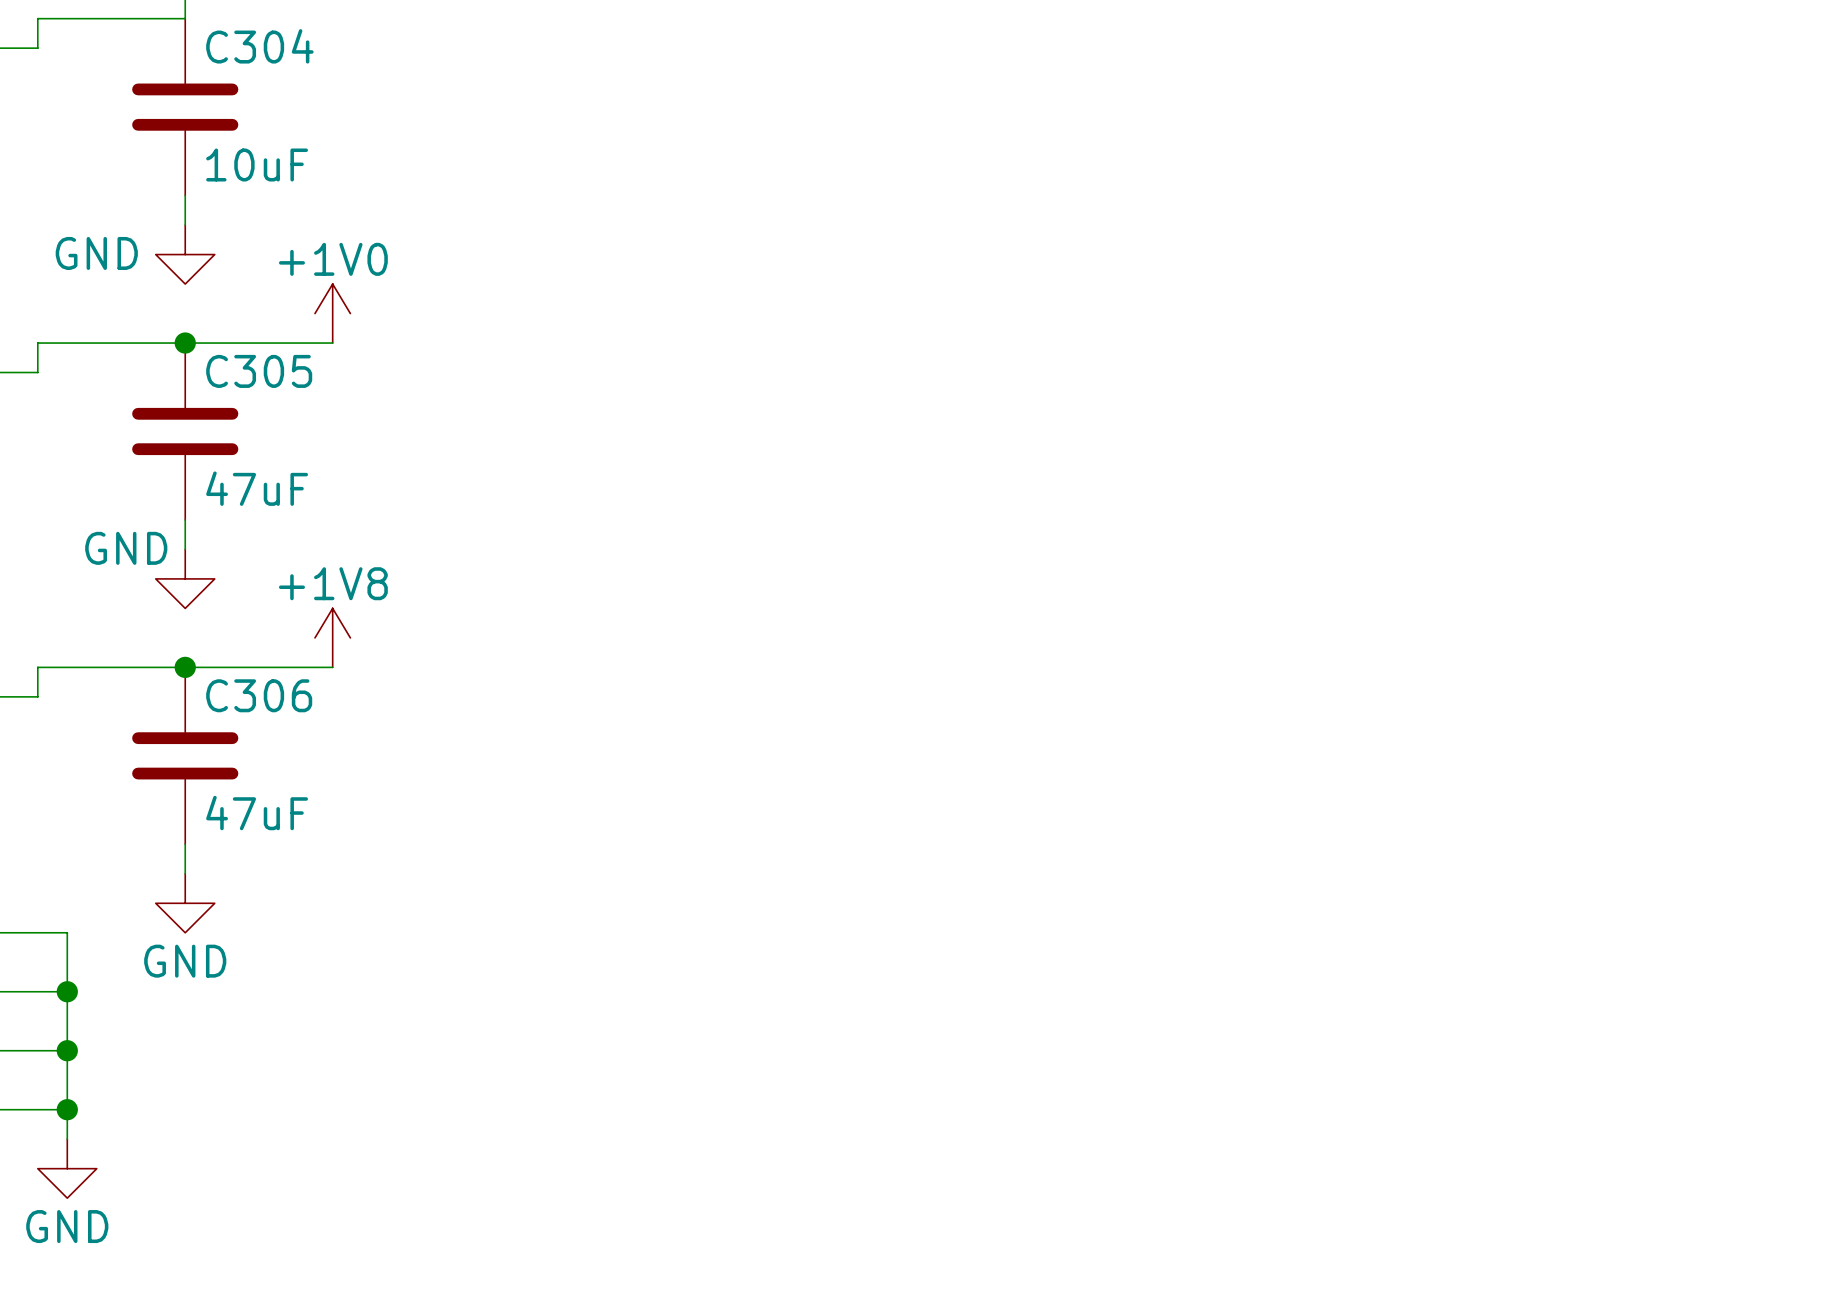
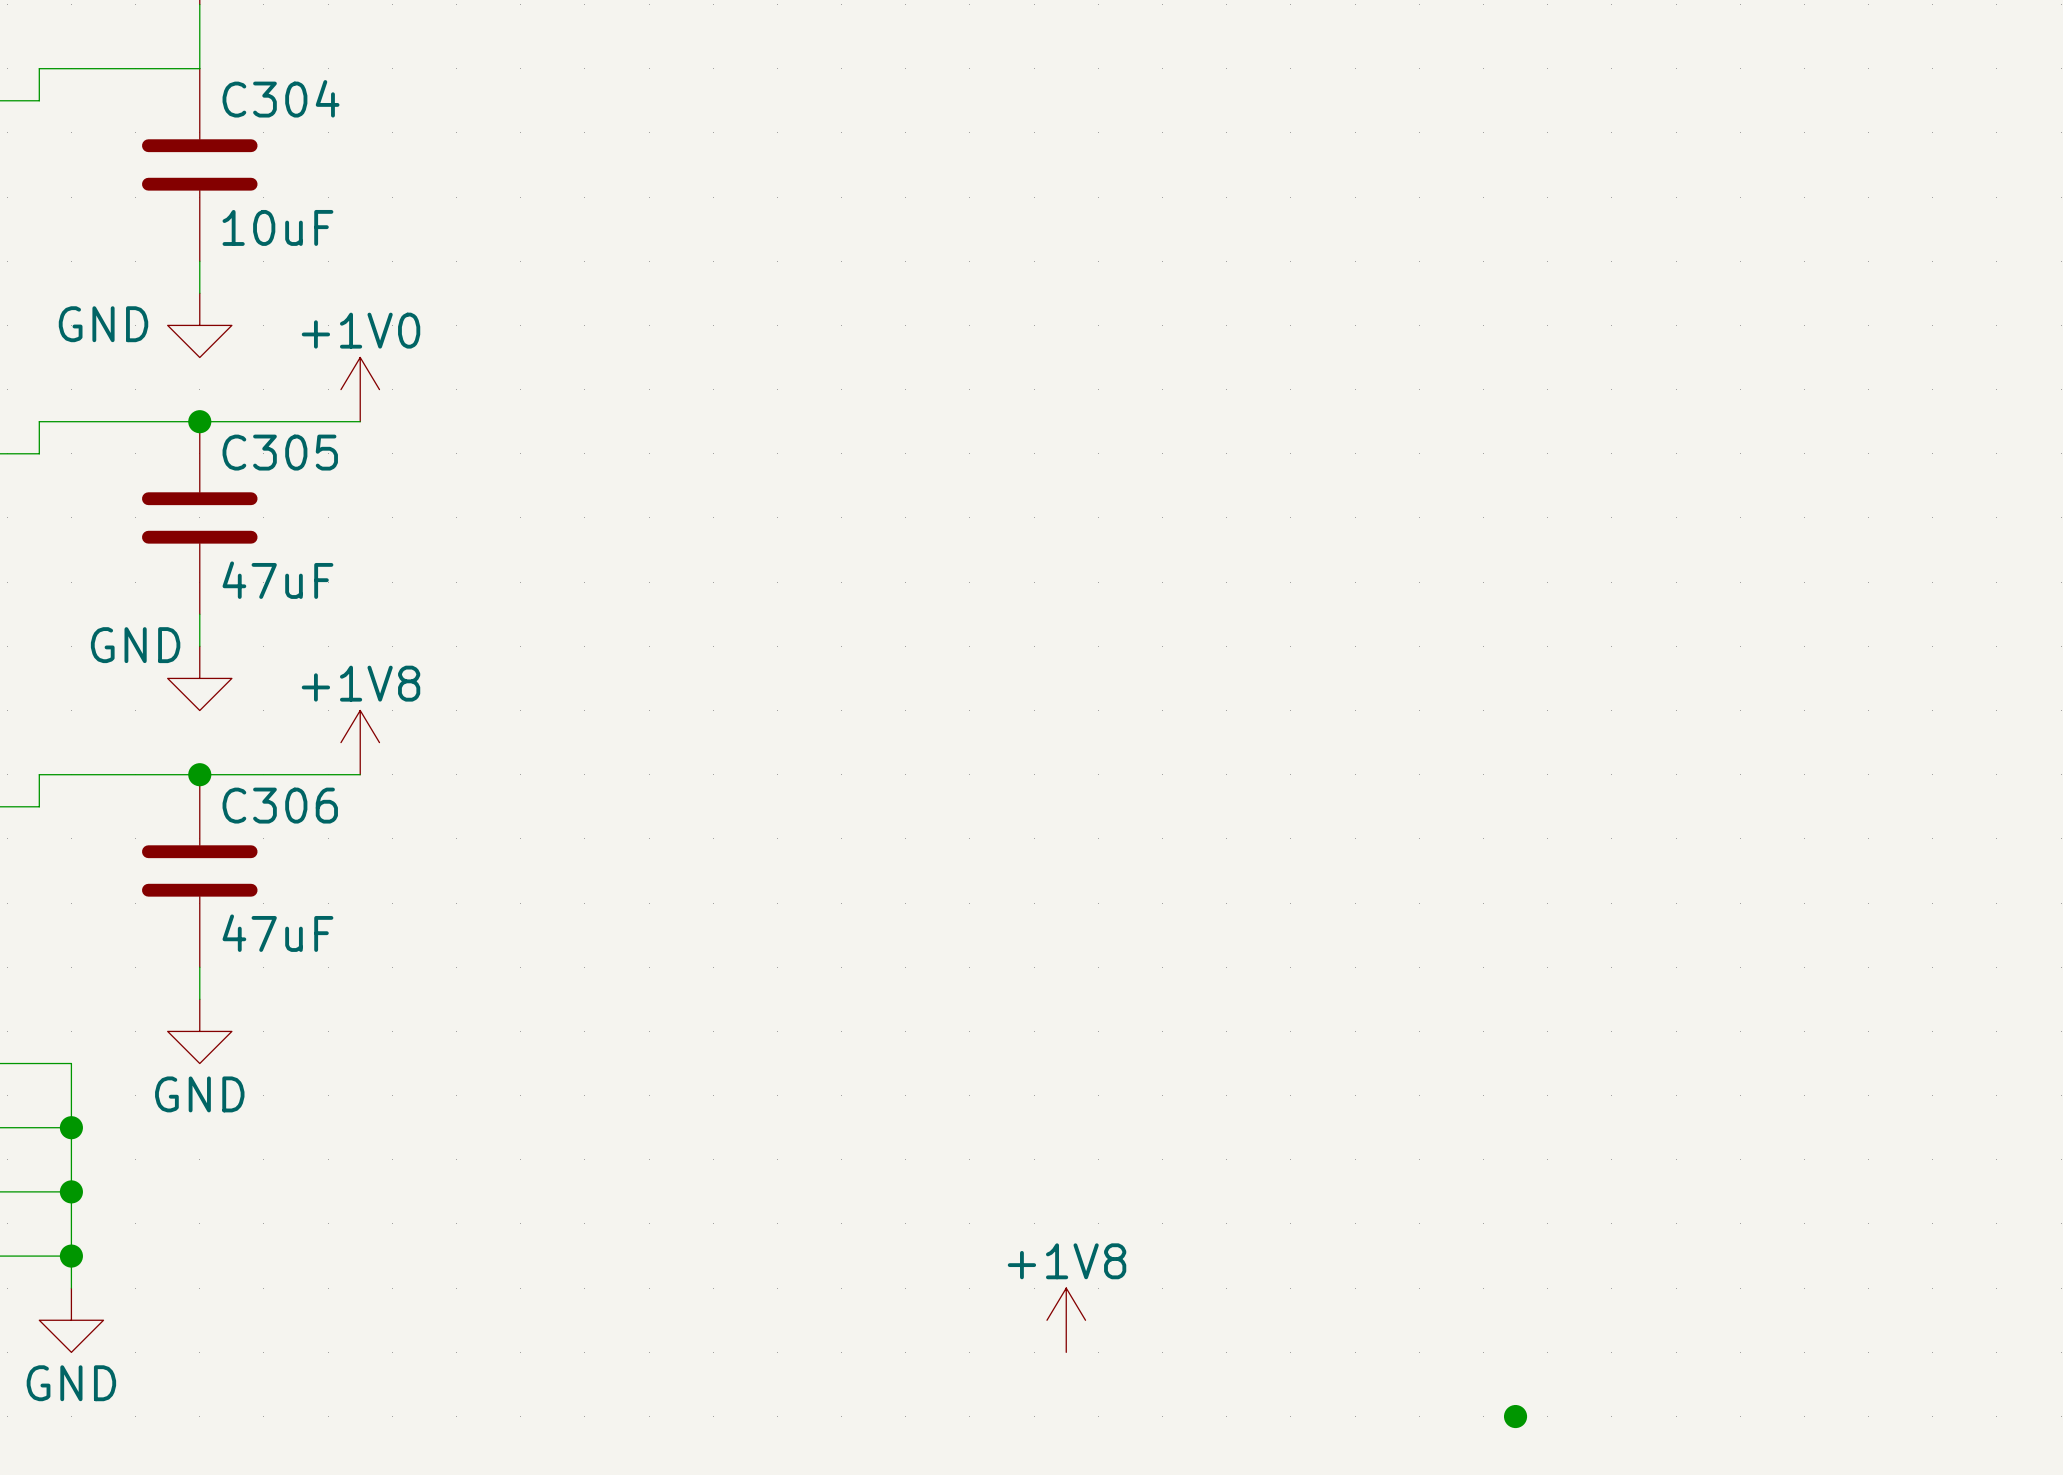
power symbol: none -> +1V8 (1066, 1320)
junction: none -> (1515, 1416)

